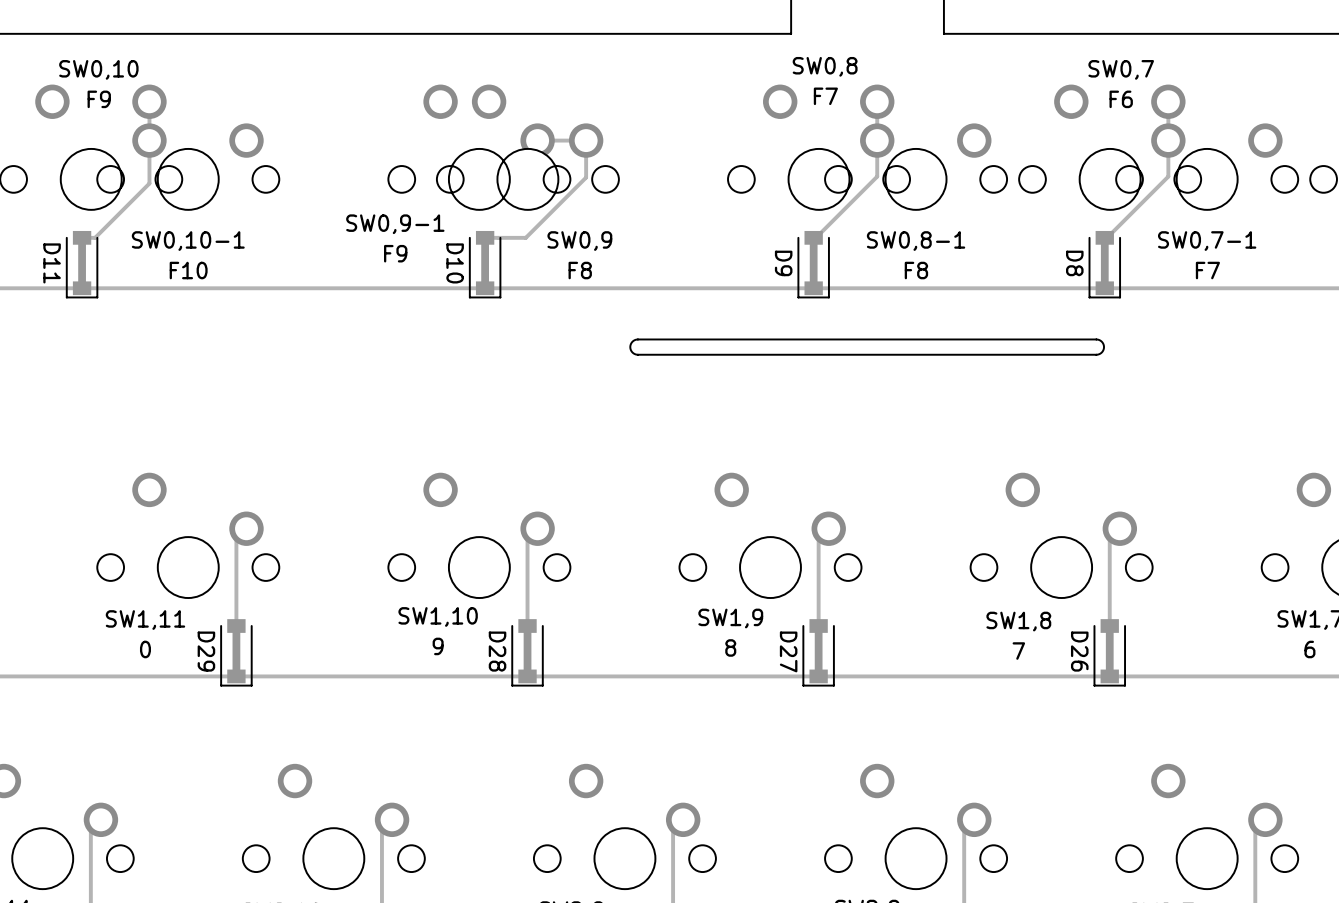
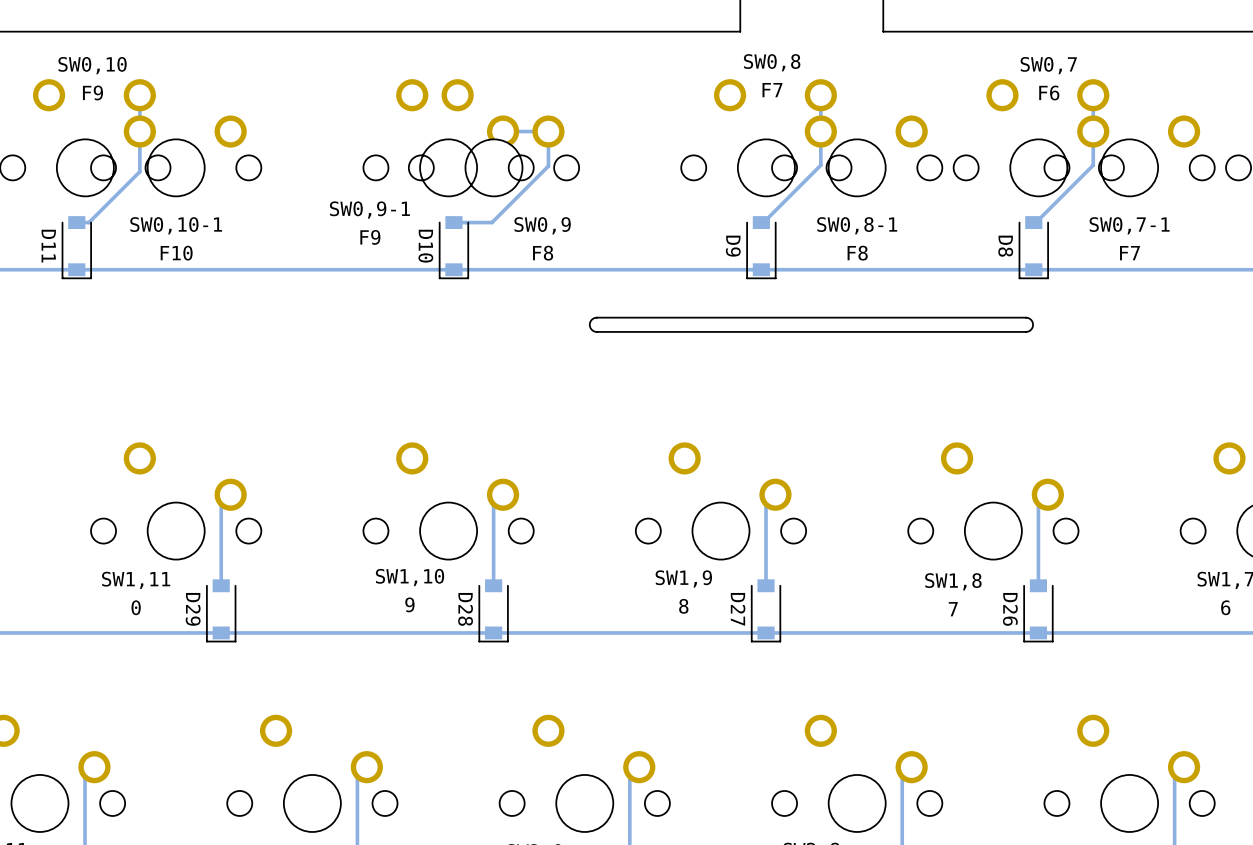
D11 footprint: [65, 230, 99, 299] -> [61, 216, 92, 280]
D10 footprint: [468, 230, 502, 299] -> [438, 216, 470, 280]
D9 footprint: [797, 230, 830, 299] -> [746, 216, 777, 280]
D8 footprint: [1088, 230, 1121, 299] -> [1018, 216, 1049, 280]
D29 footprint: [220, 619, 253, 687] -> [206, 579, 237, 643]
D28 footprint: [511, 619, 544, 687] -> [478, 579, 509, 643]
D27 footprint: [802, 619, 835, 687] -> [750, 579, 782, 643]
D26 footprint: [1093, 619, 1126, 687] -> [1023, 579, 1054, 643]

